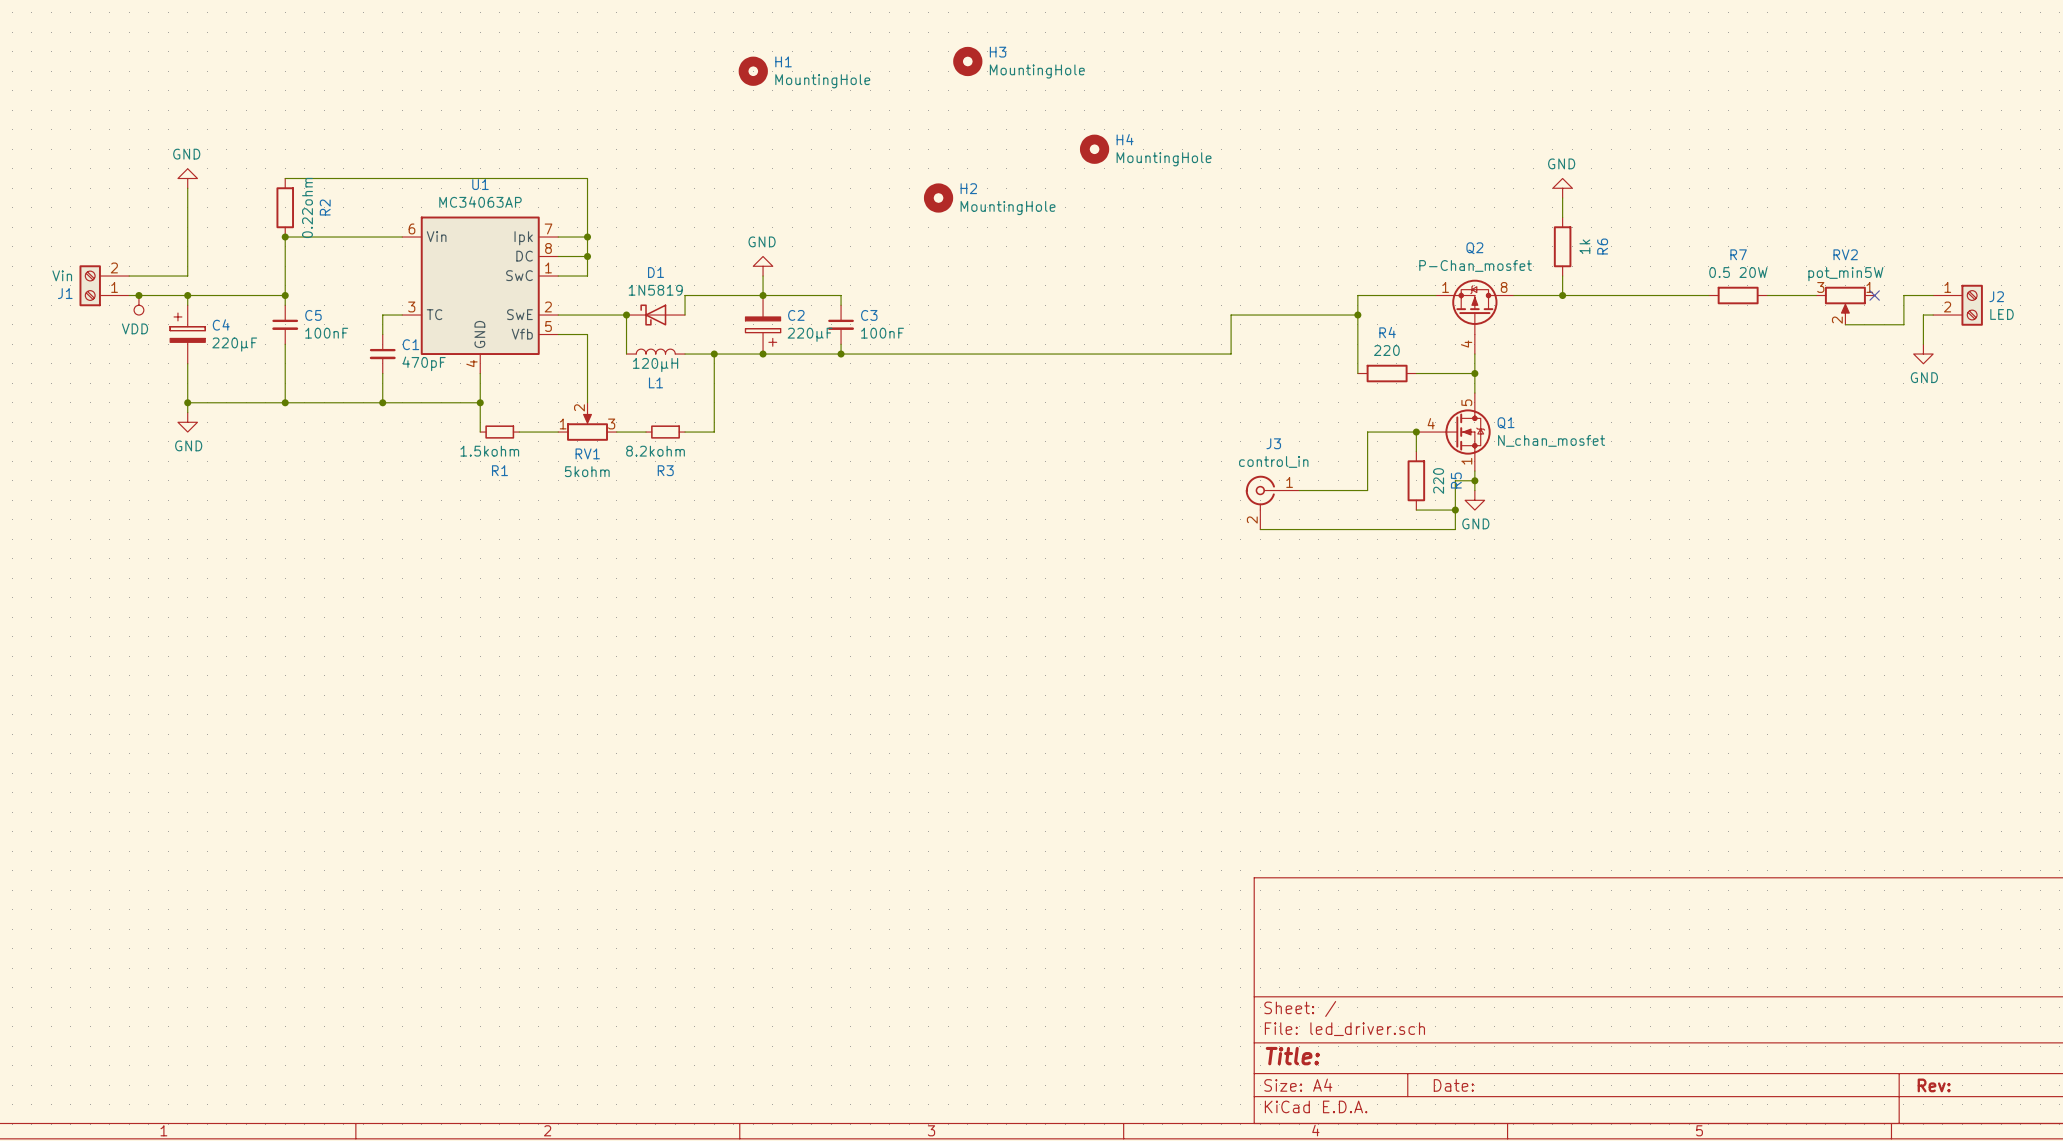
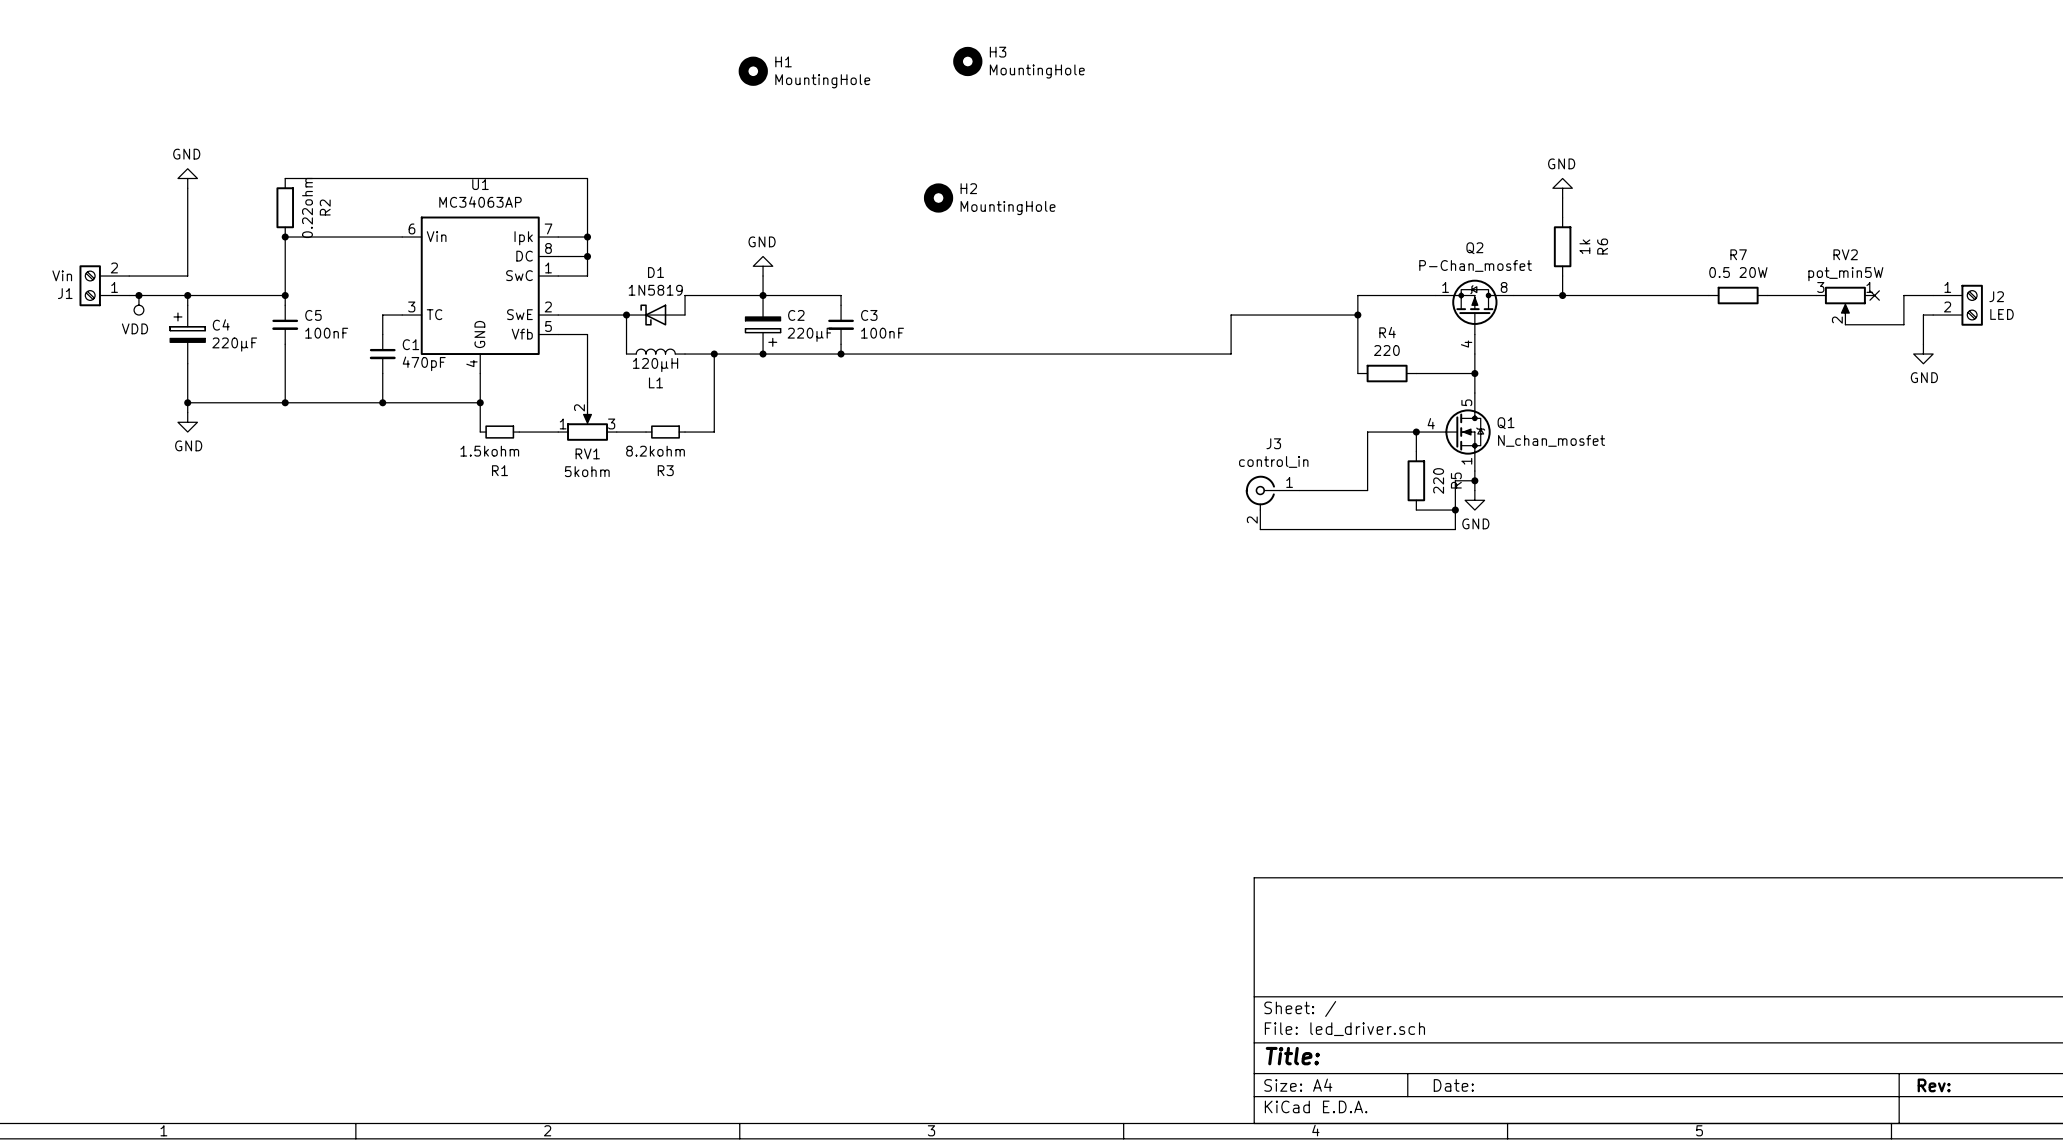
H4: MountingHole (1094, 149) -> none

